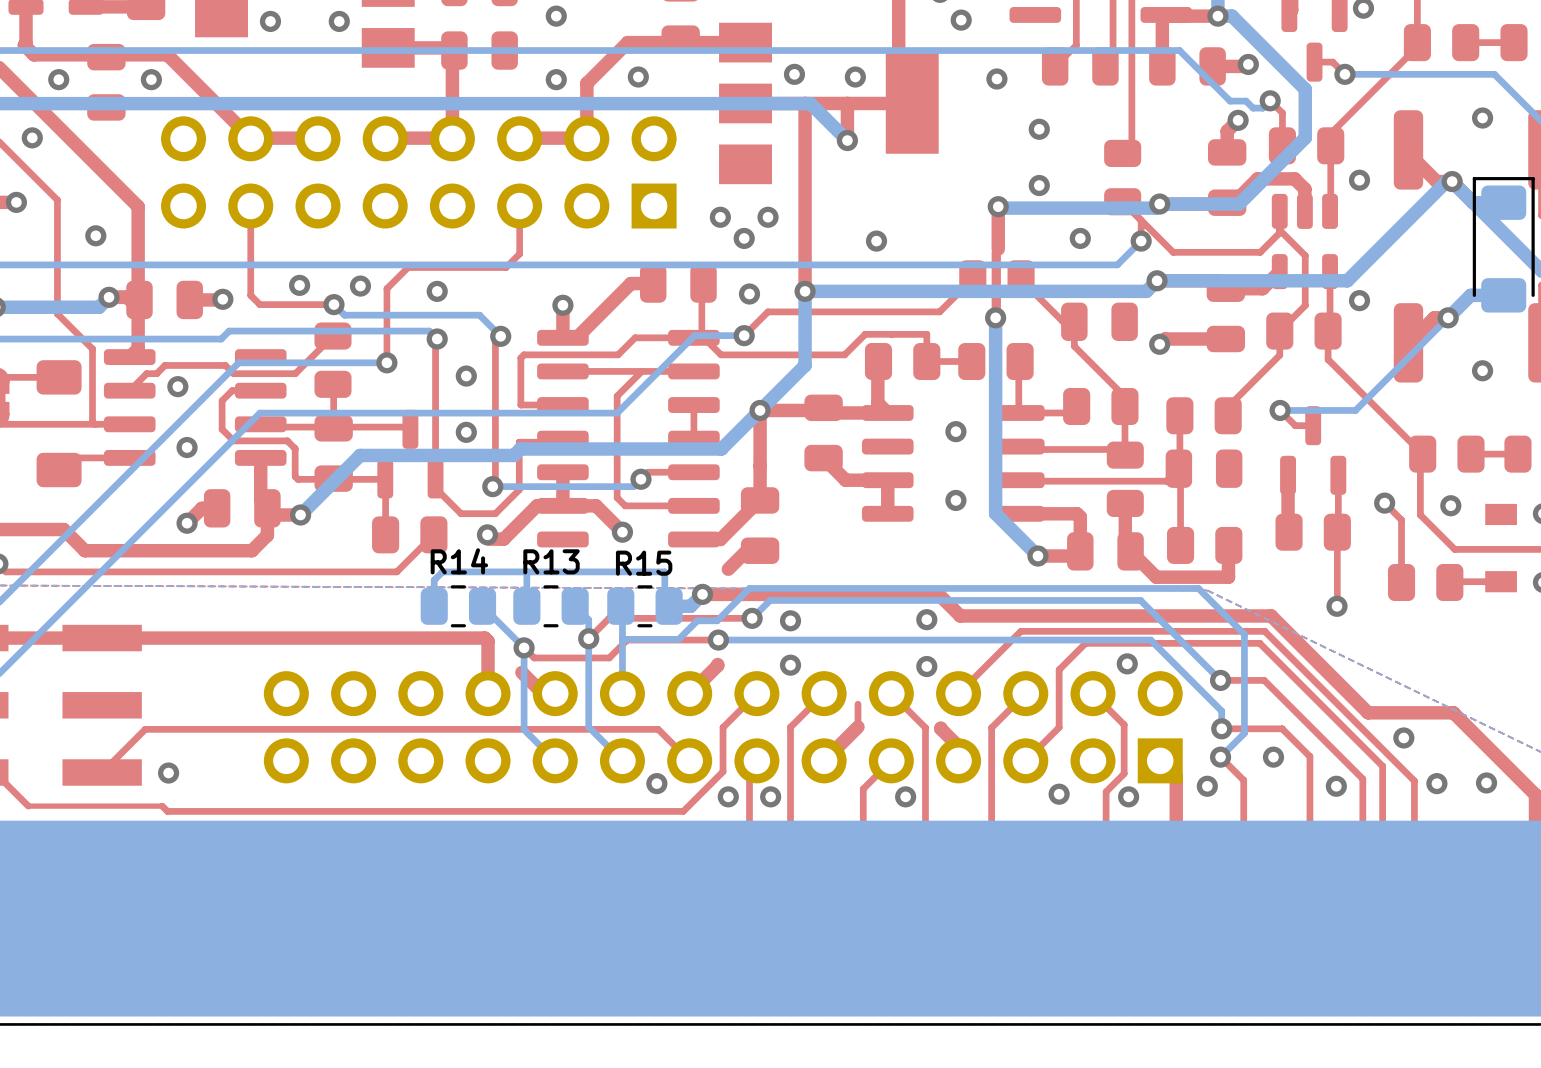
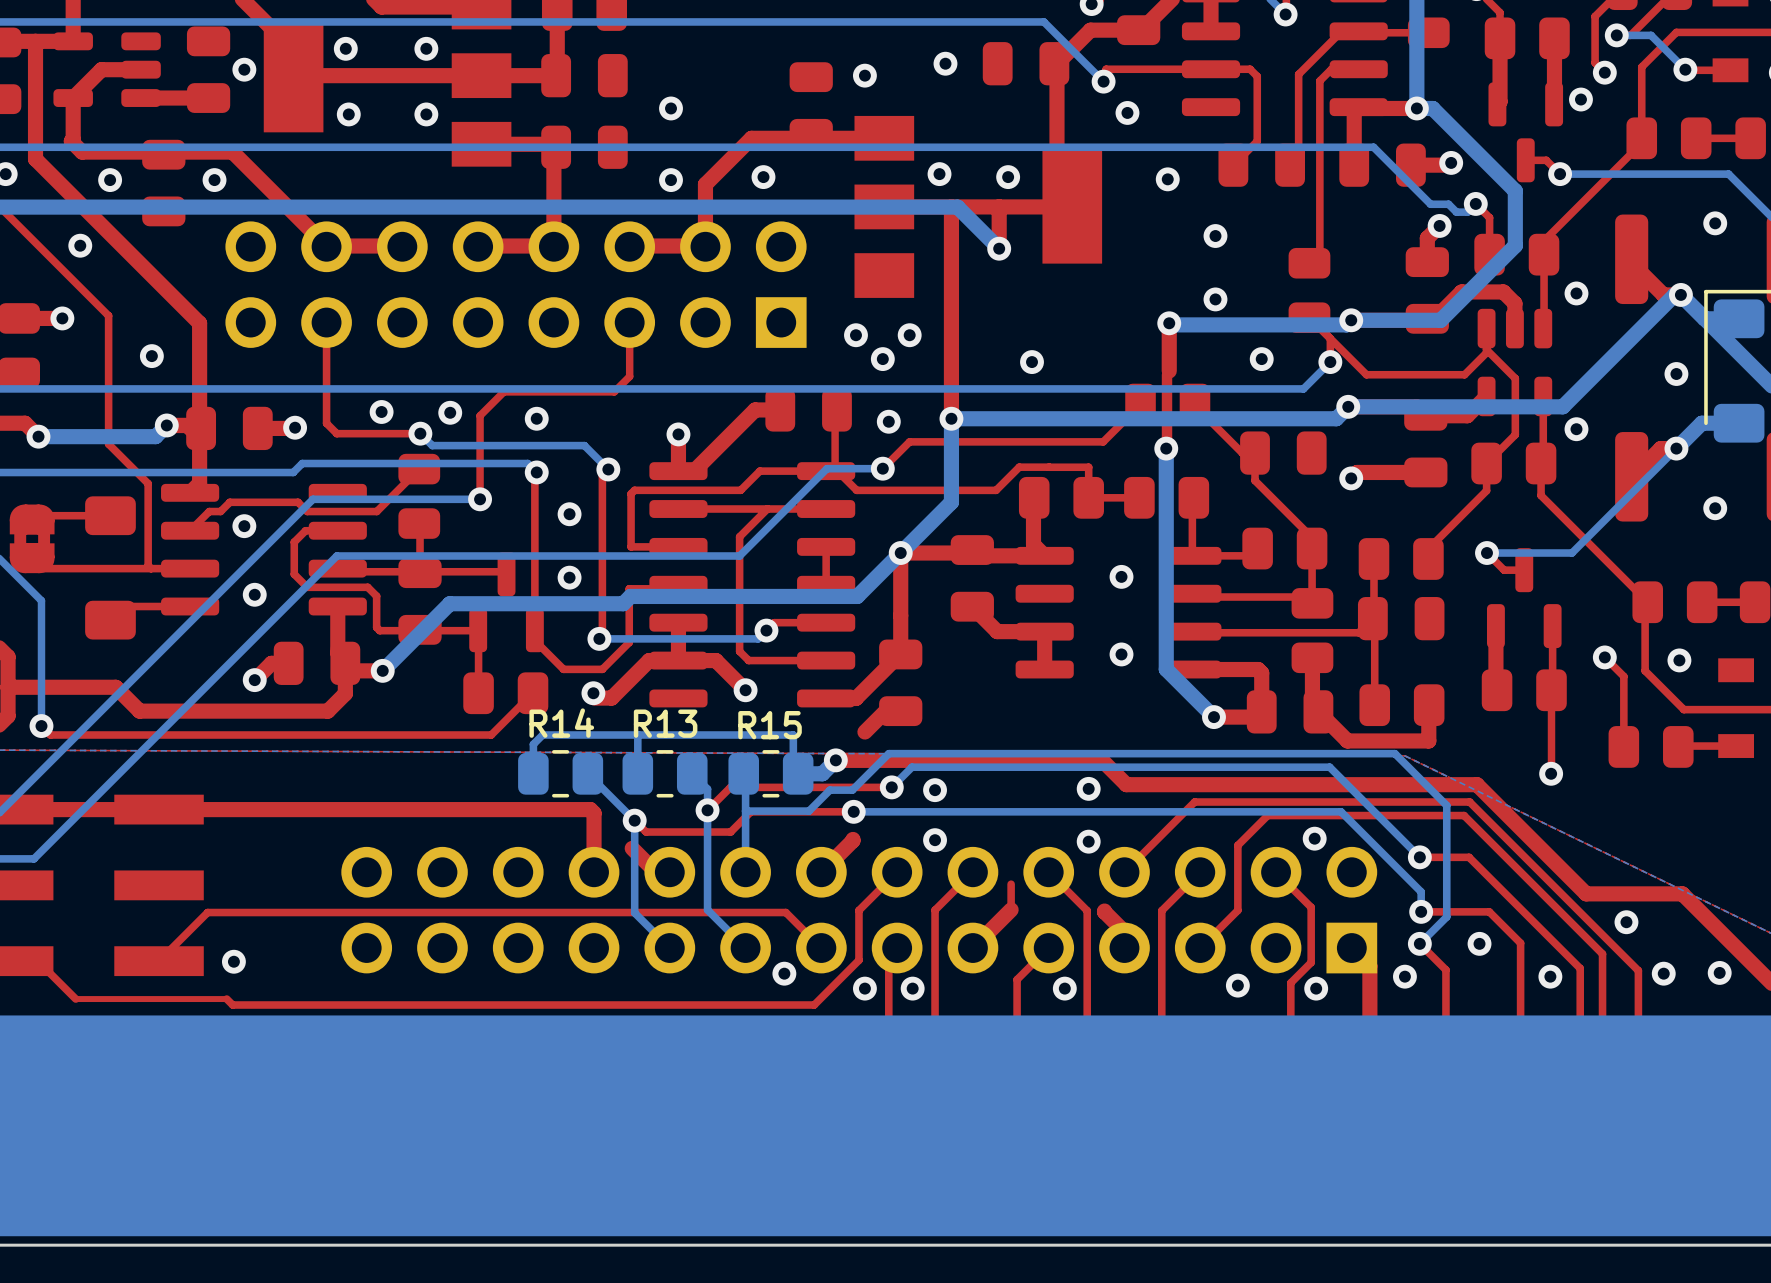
via: none -> (1676, 374)

